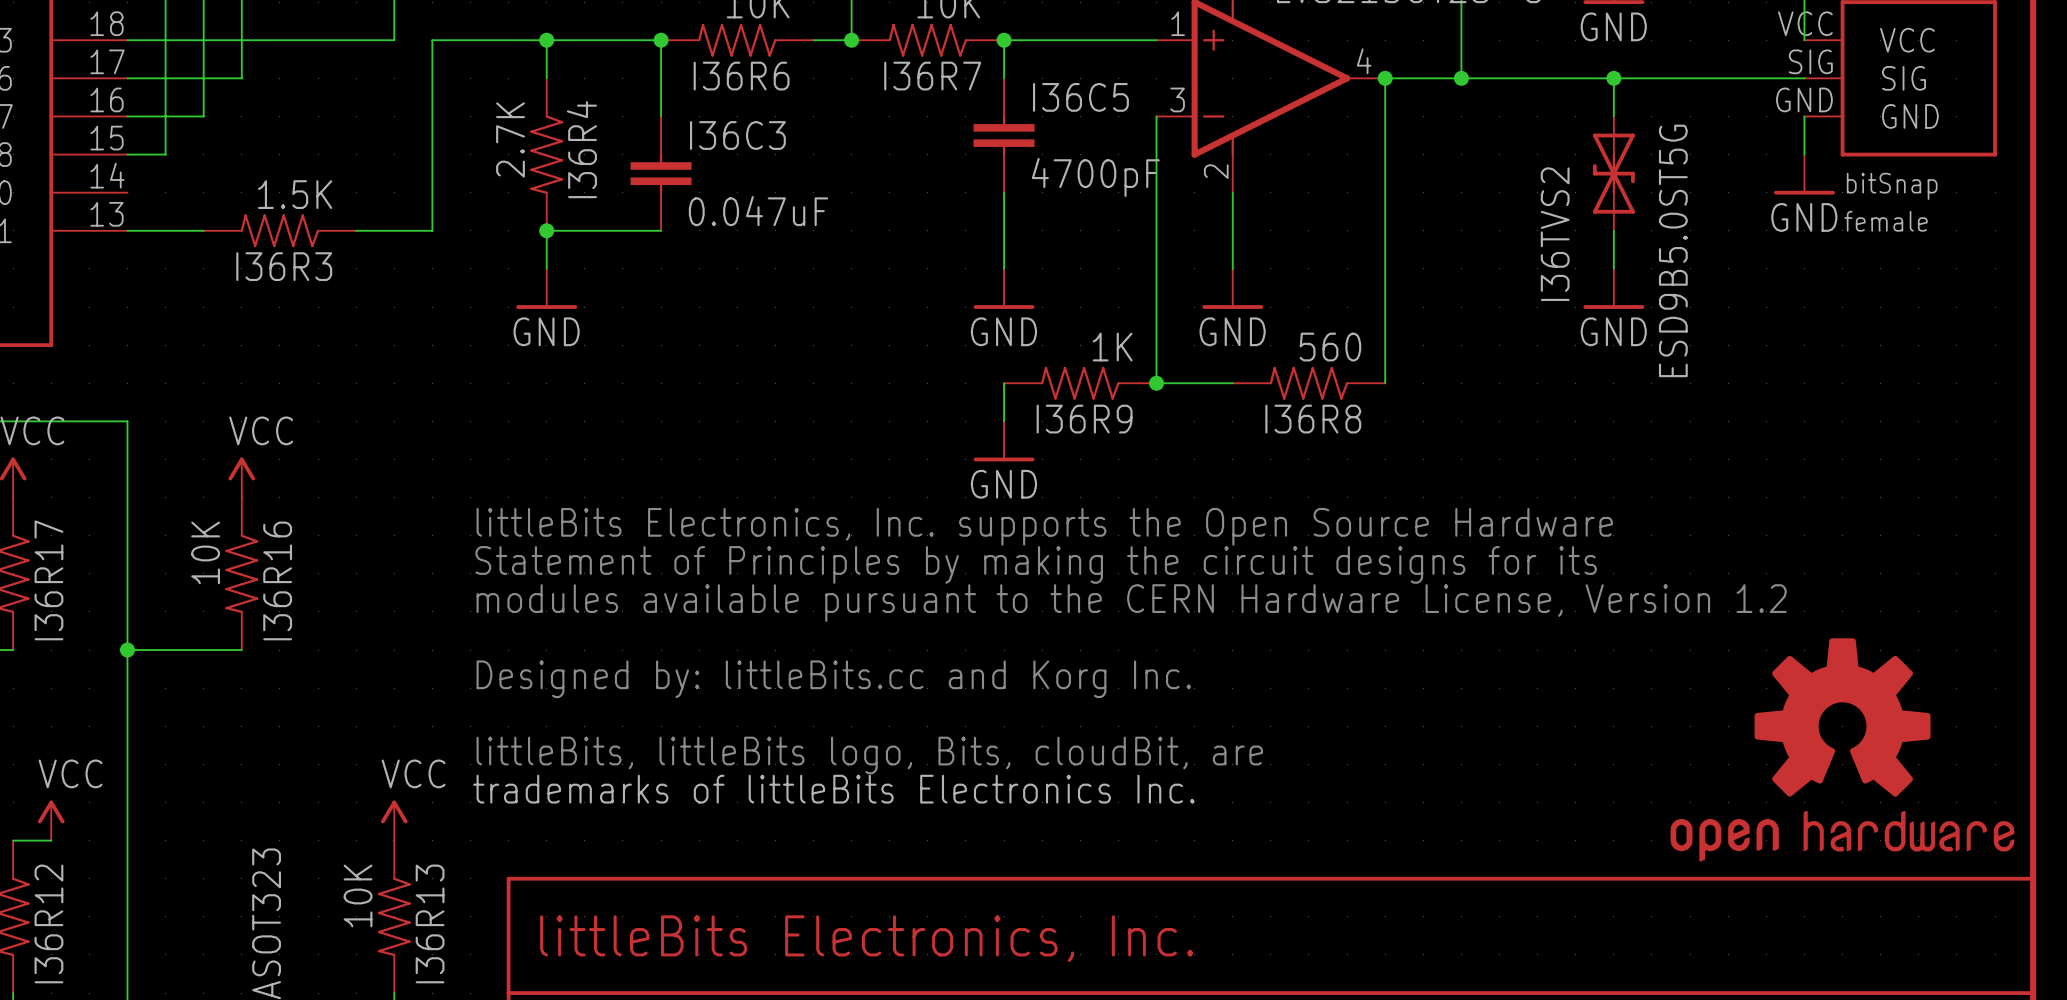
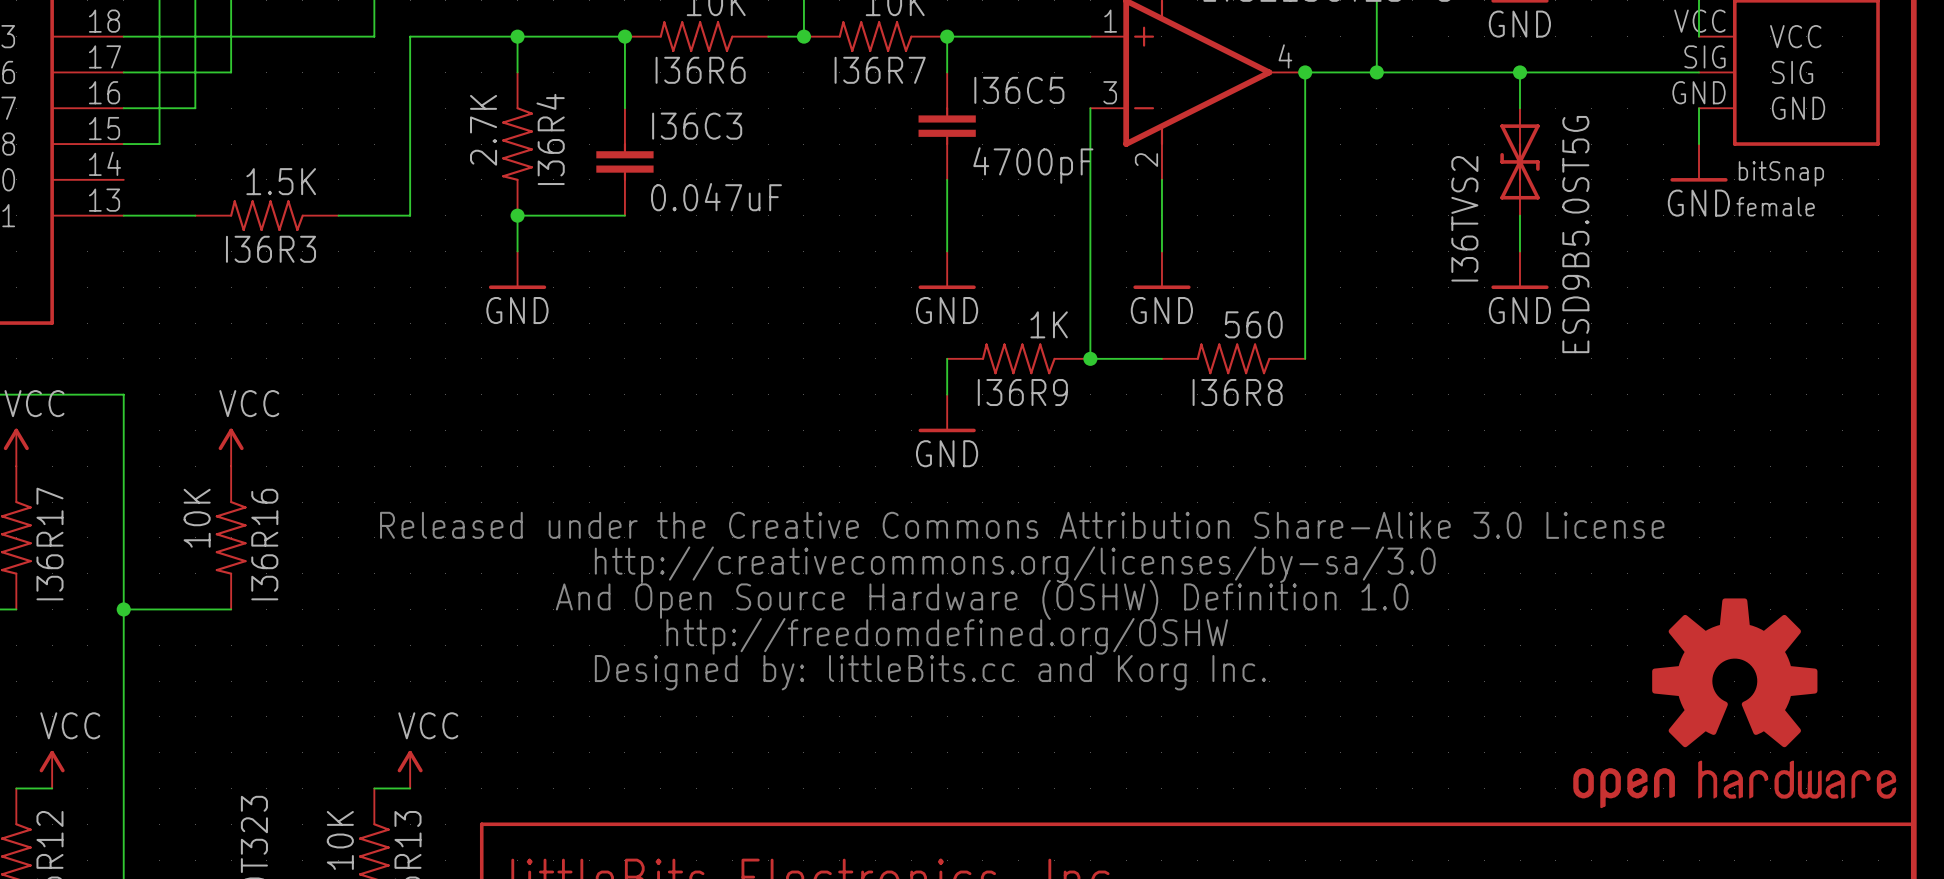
part: none -> (1022, 601)
part: (1129, 655) -> none
power symbol position: VCC (394, 820) -> VCC (410, 769)
wire: none -> (374, 788) (410, 788)

